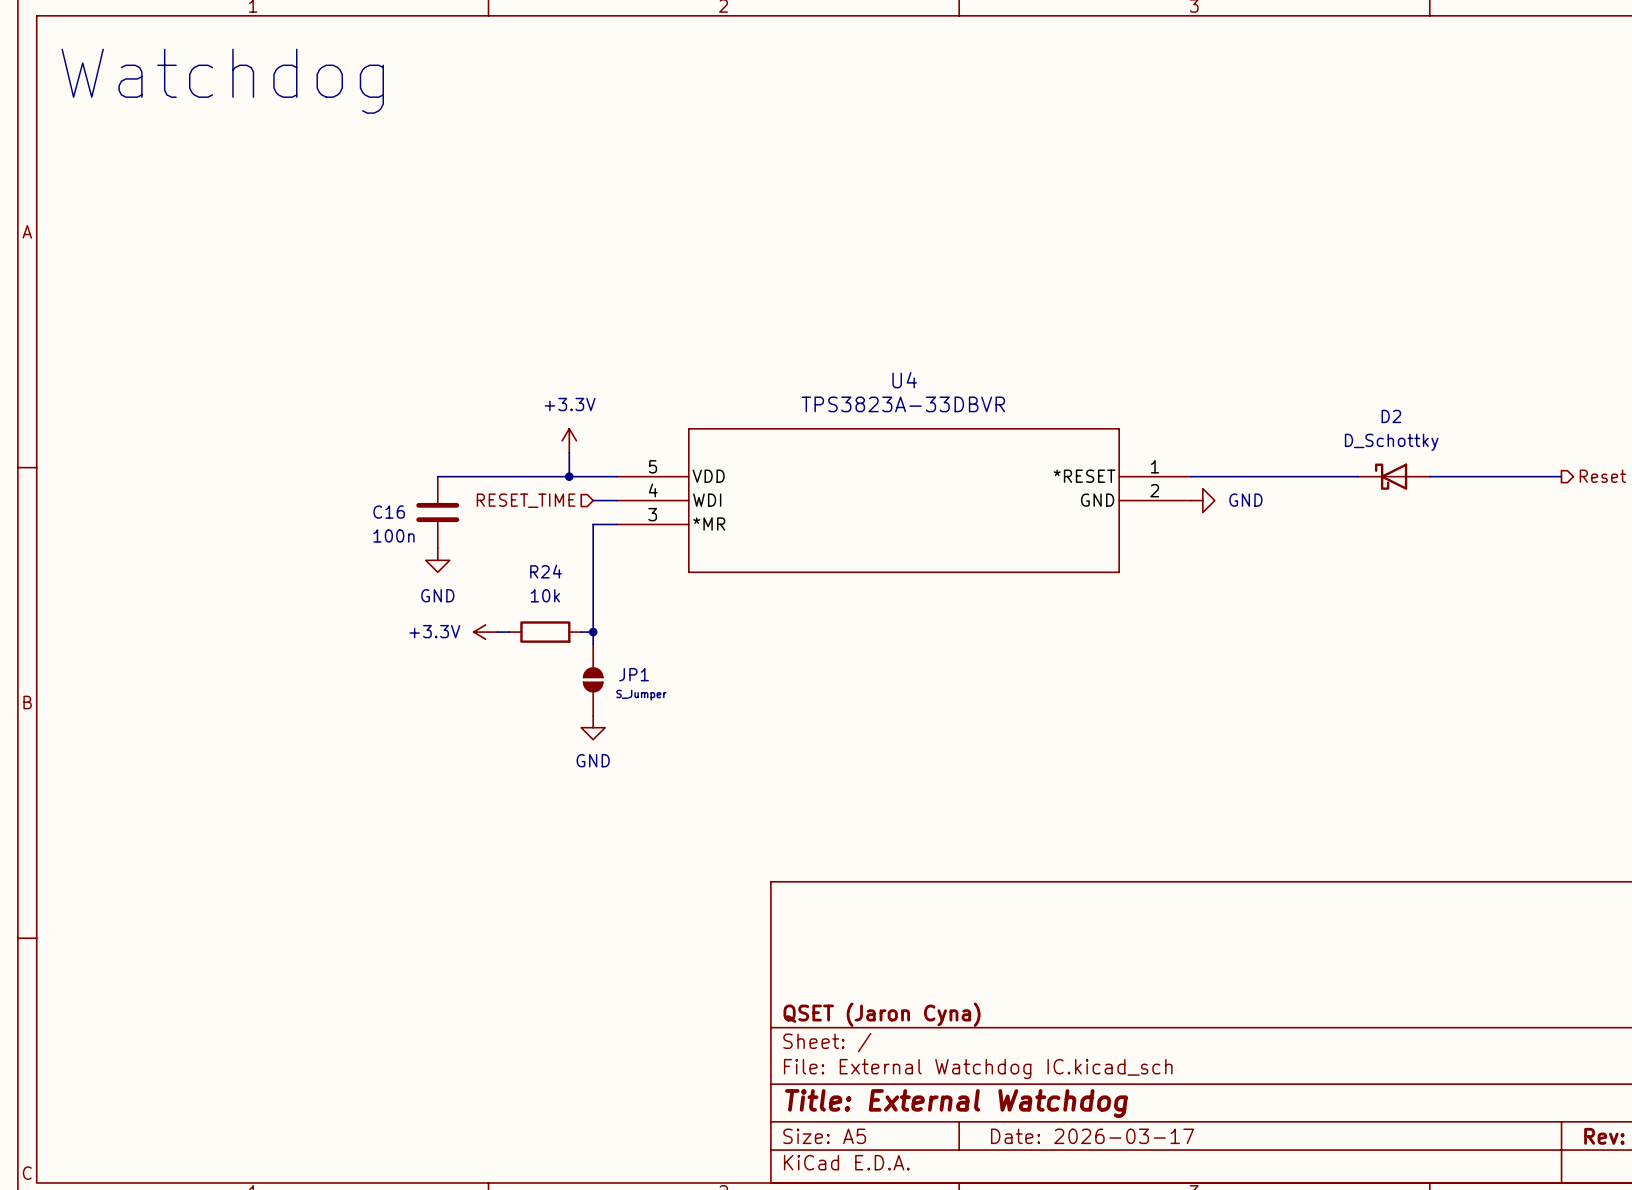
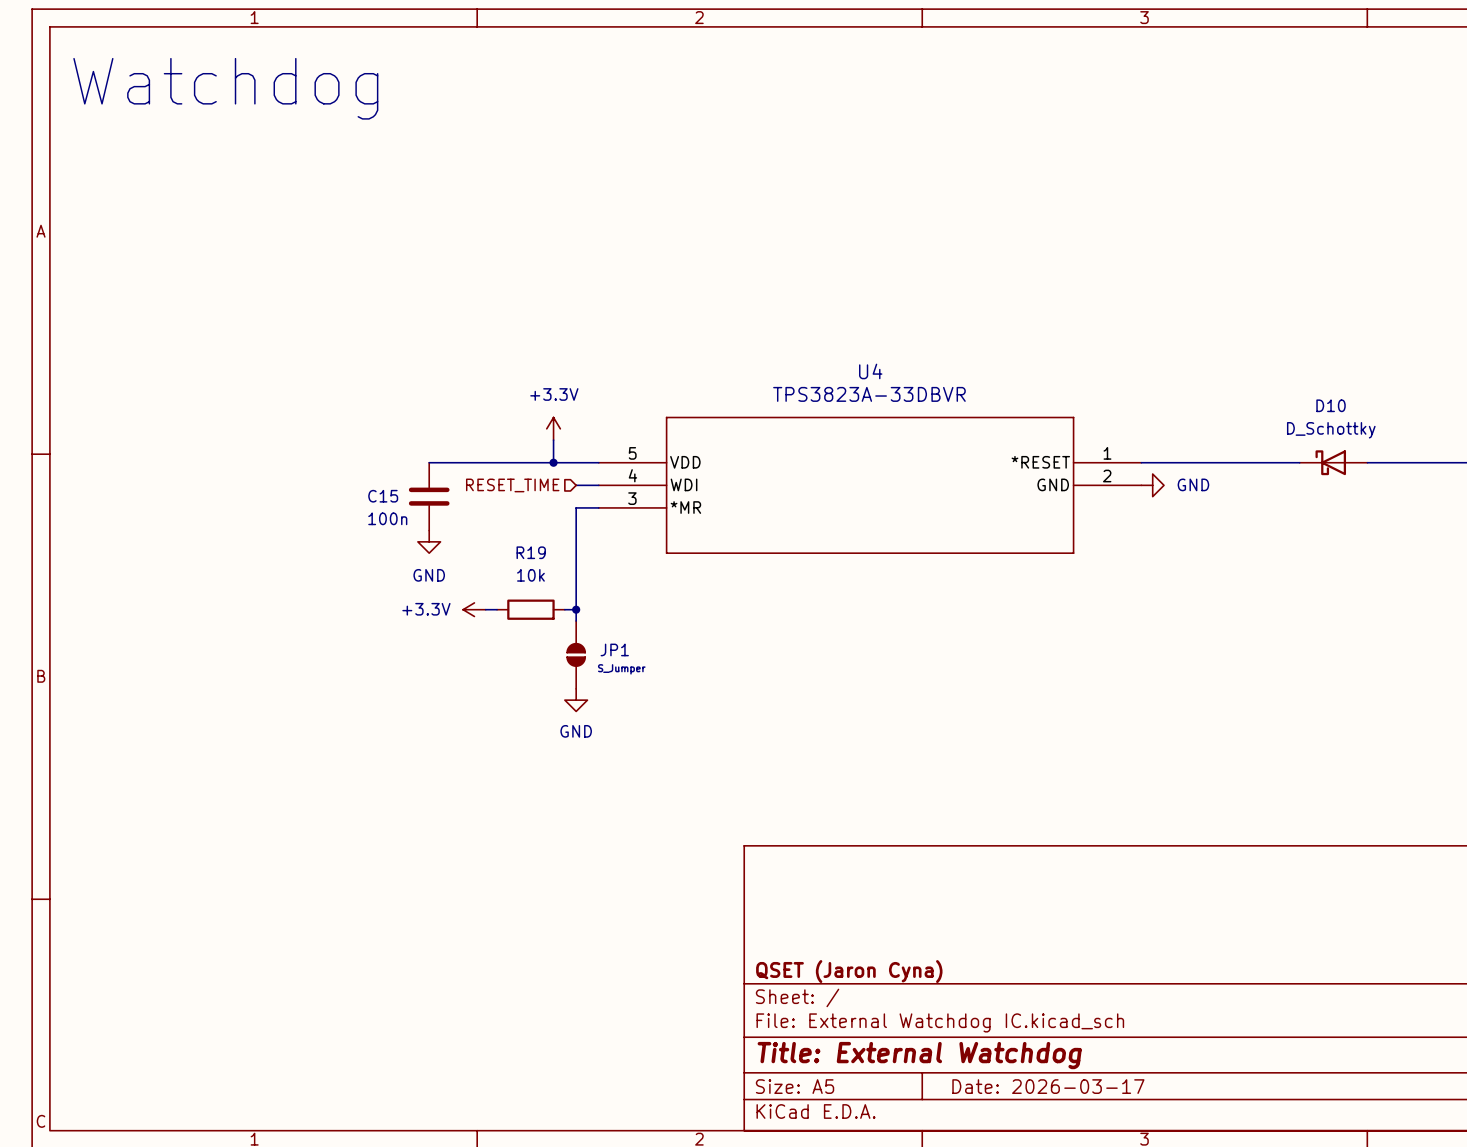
D2 name: D2 (1391, 416) -> D10 (1331, 405)
C16 name: C16 (389, 512) -> C15 (383, 496)
R24 name: R24 (545, 571) -> R19 (531, 552)

